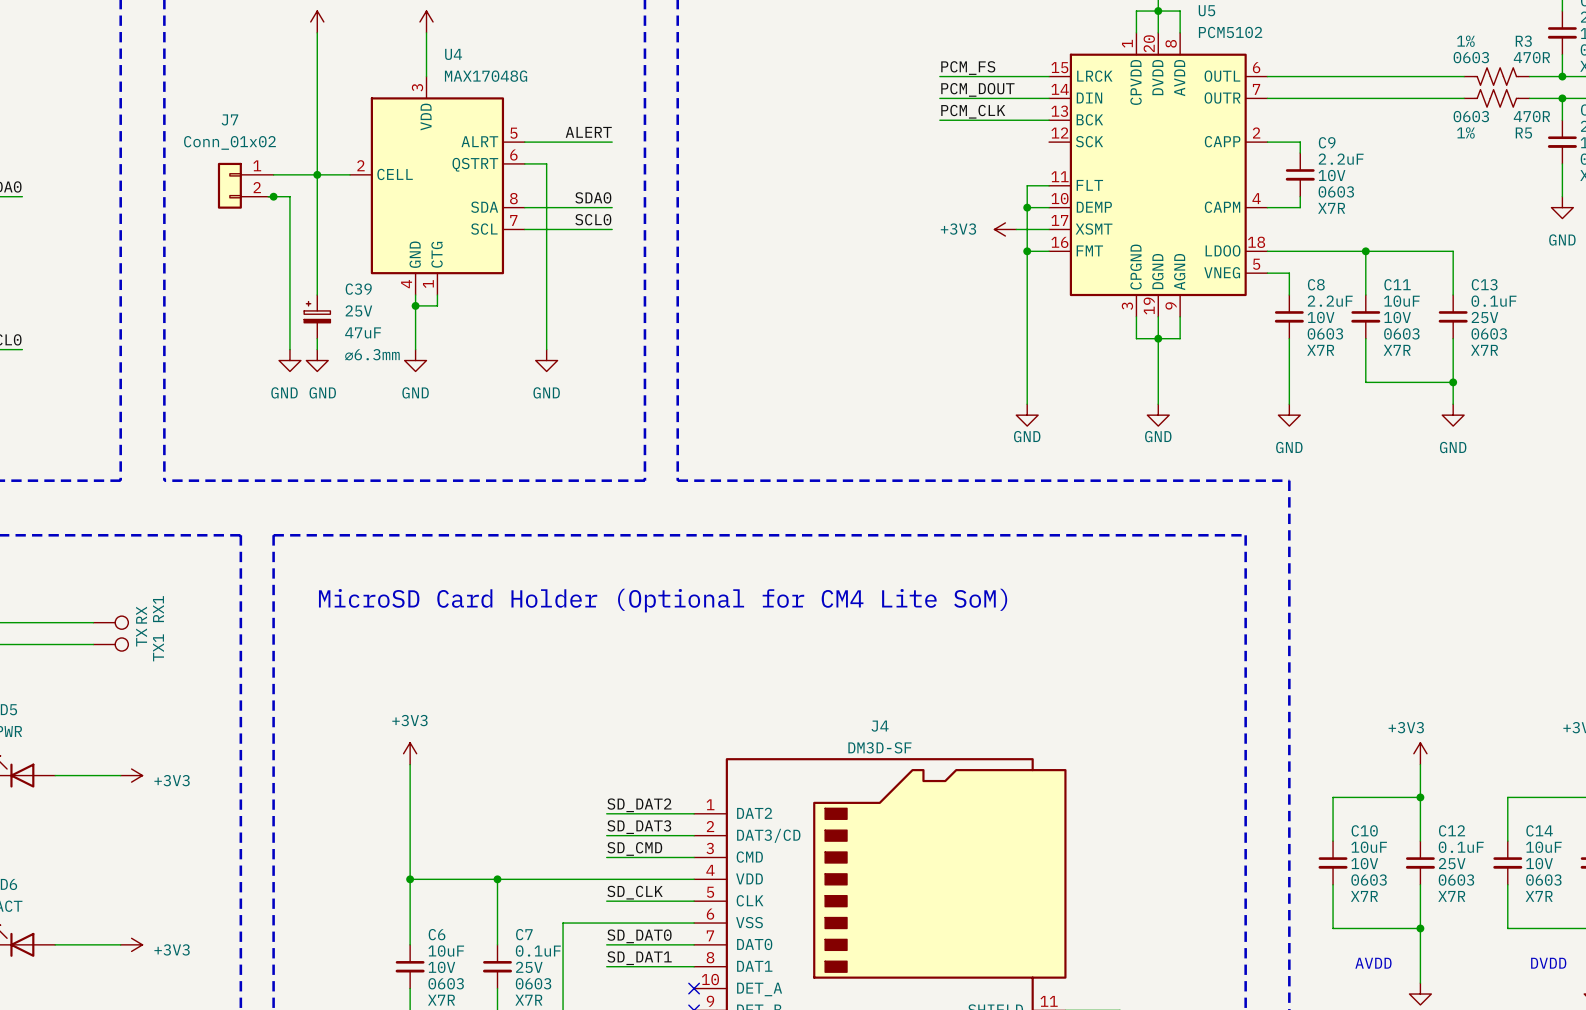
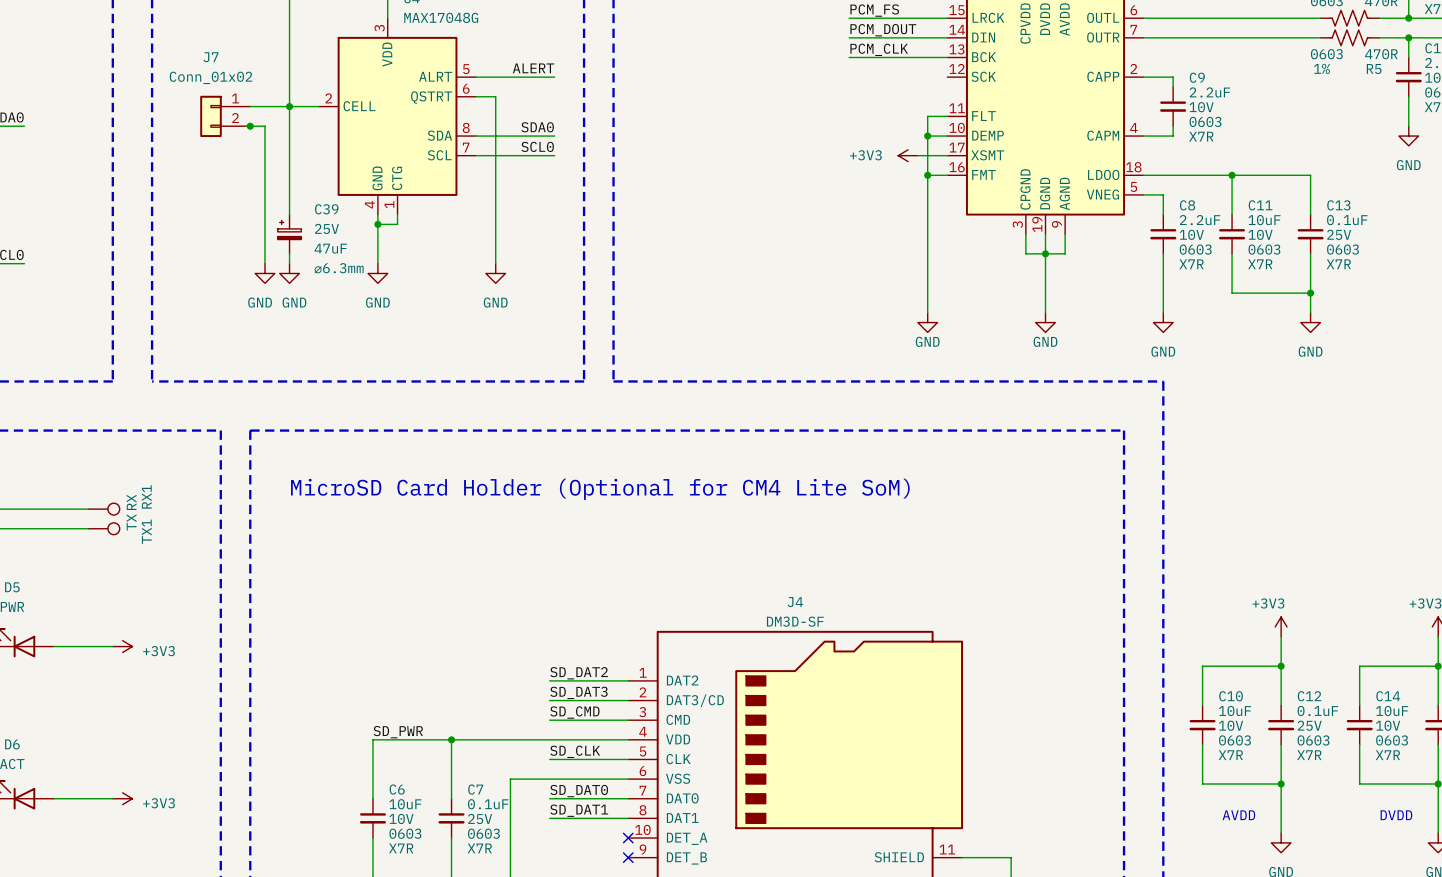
power symbol: +3V3 (410, 753) -> none
wire: (410, 764) (410, 879) -> none
label: none -> SD_PWR (398, 732)
junction: (410, 879) -> none

